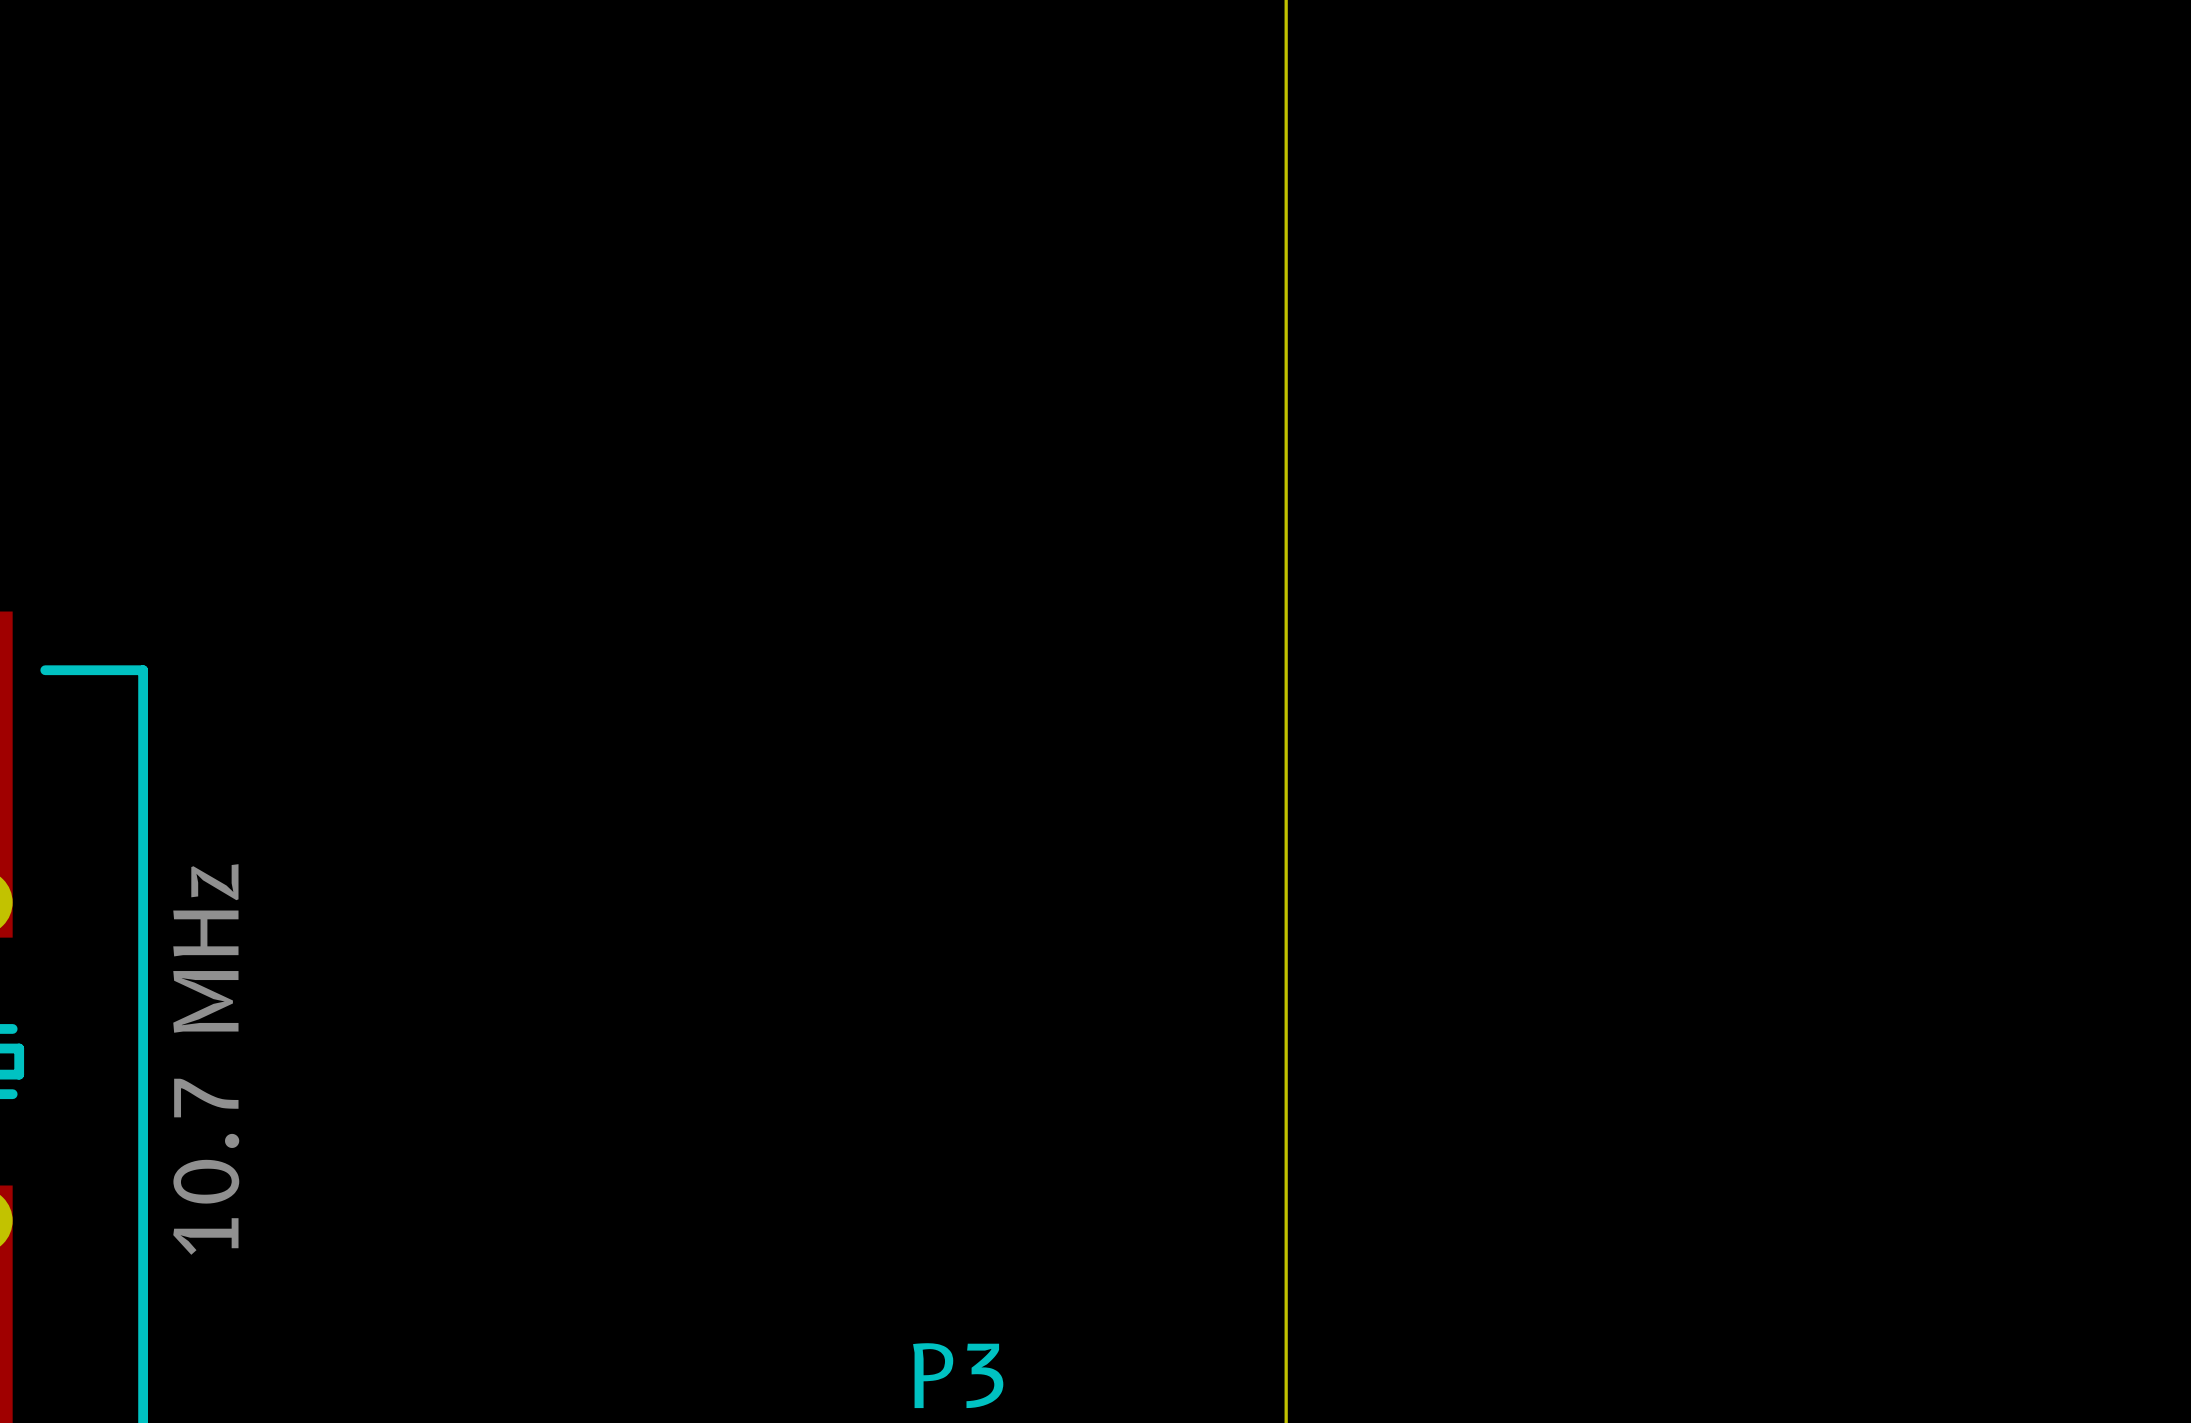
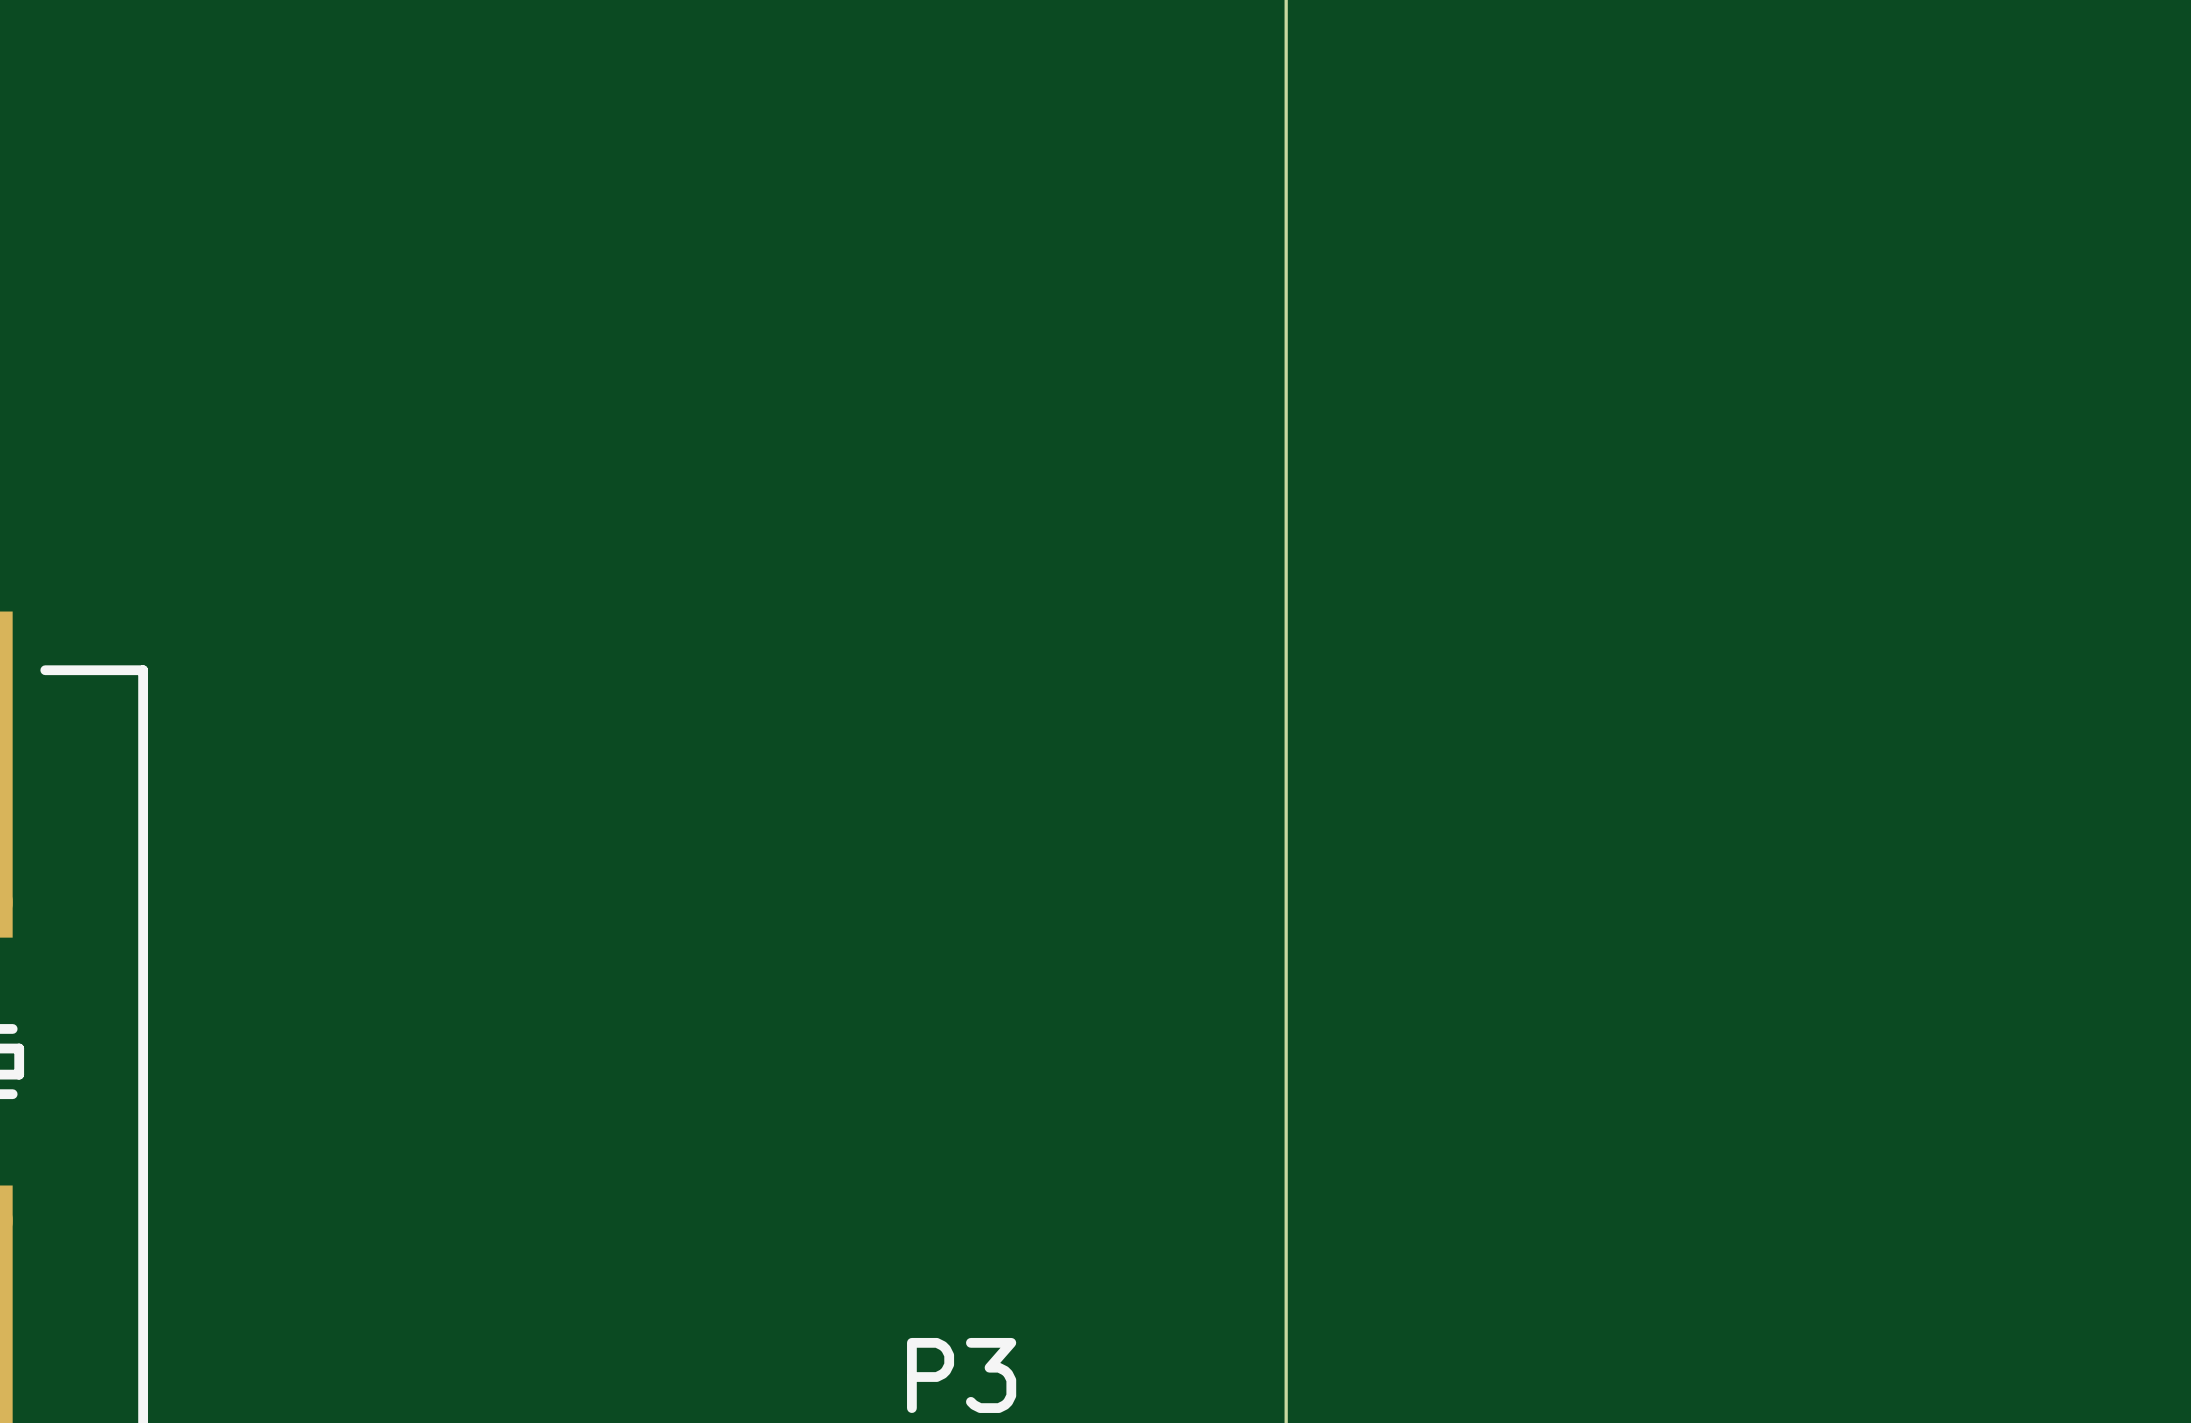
part value: 10.7 MHz (206, 1059) -> none

